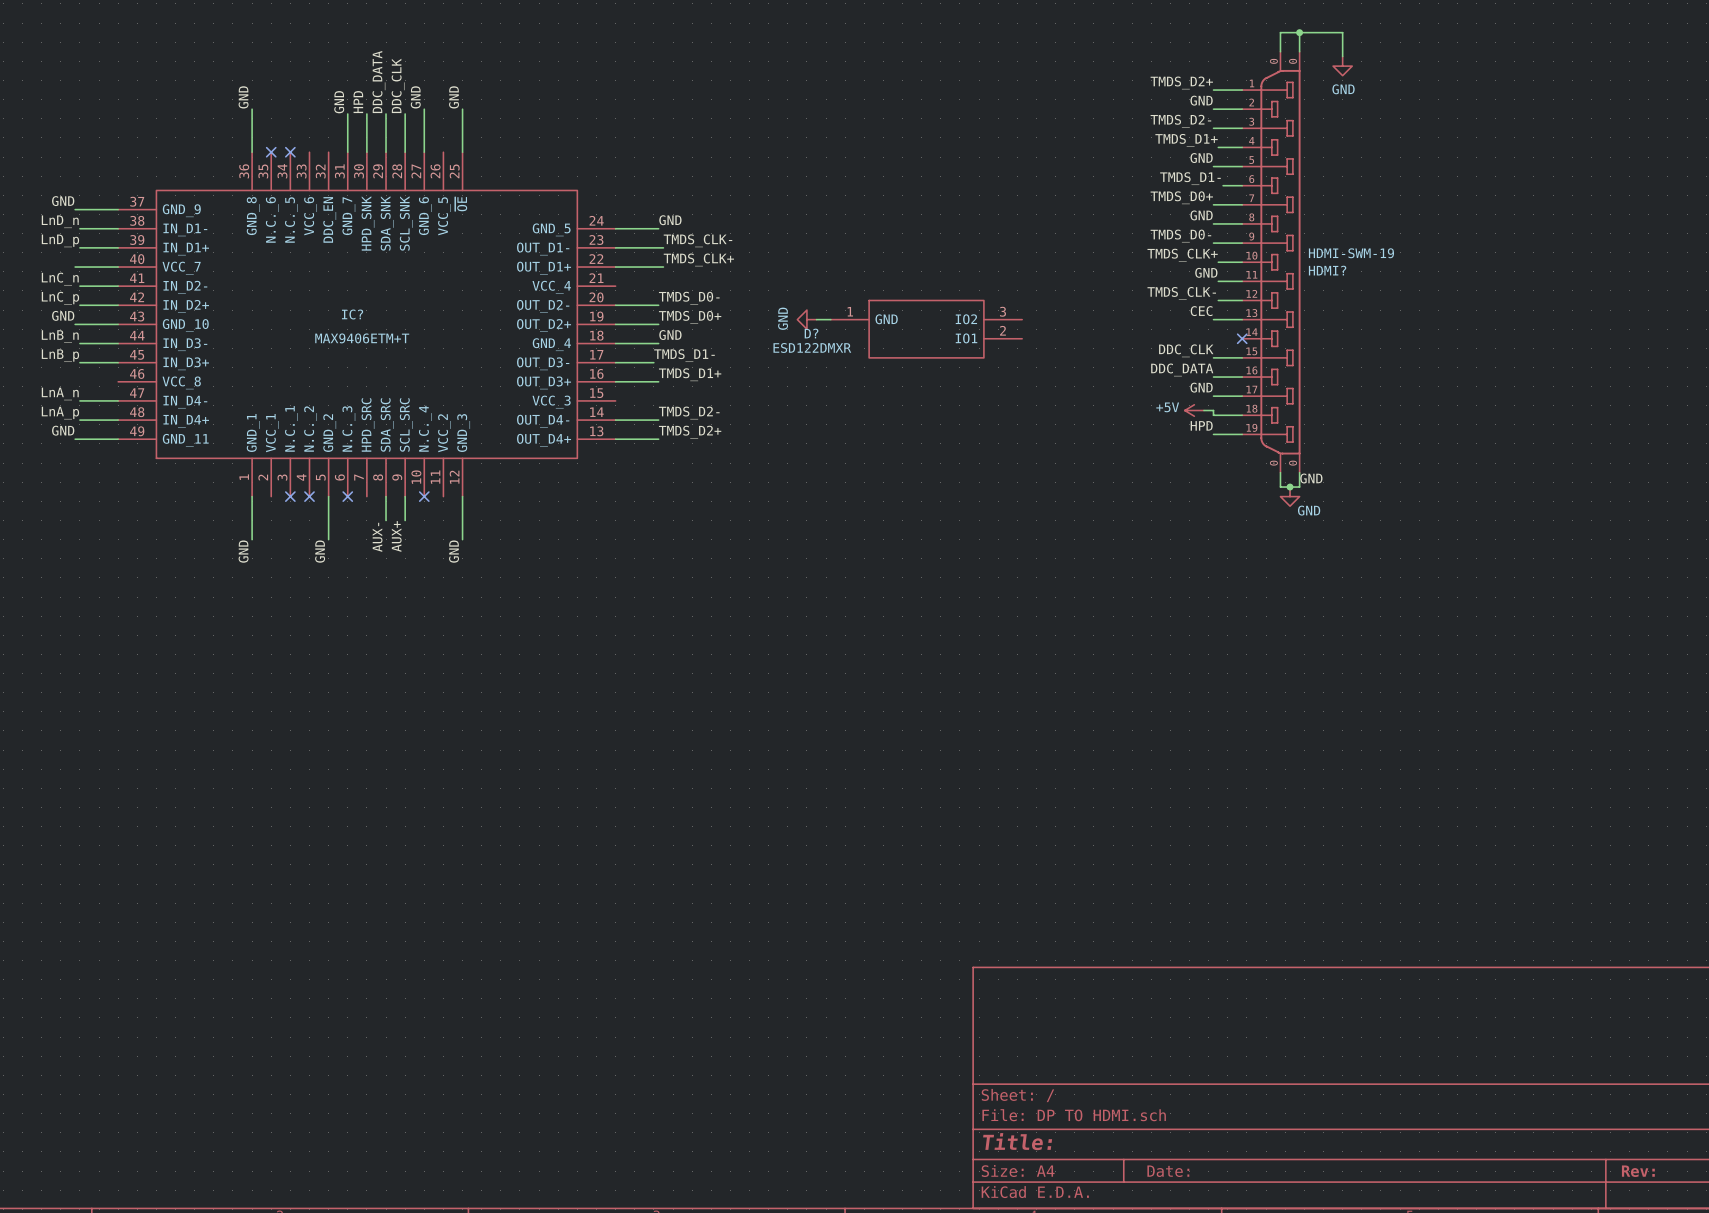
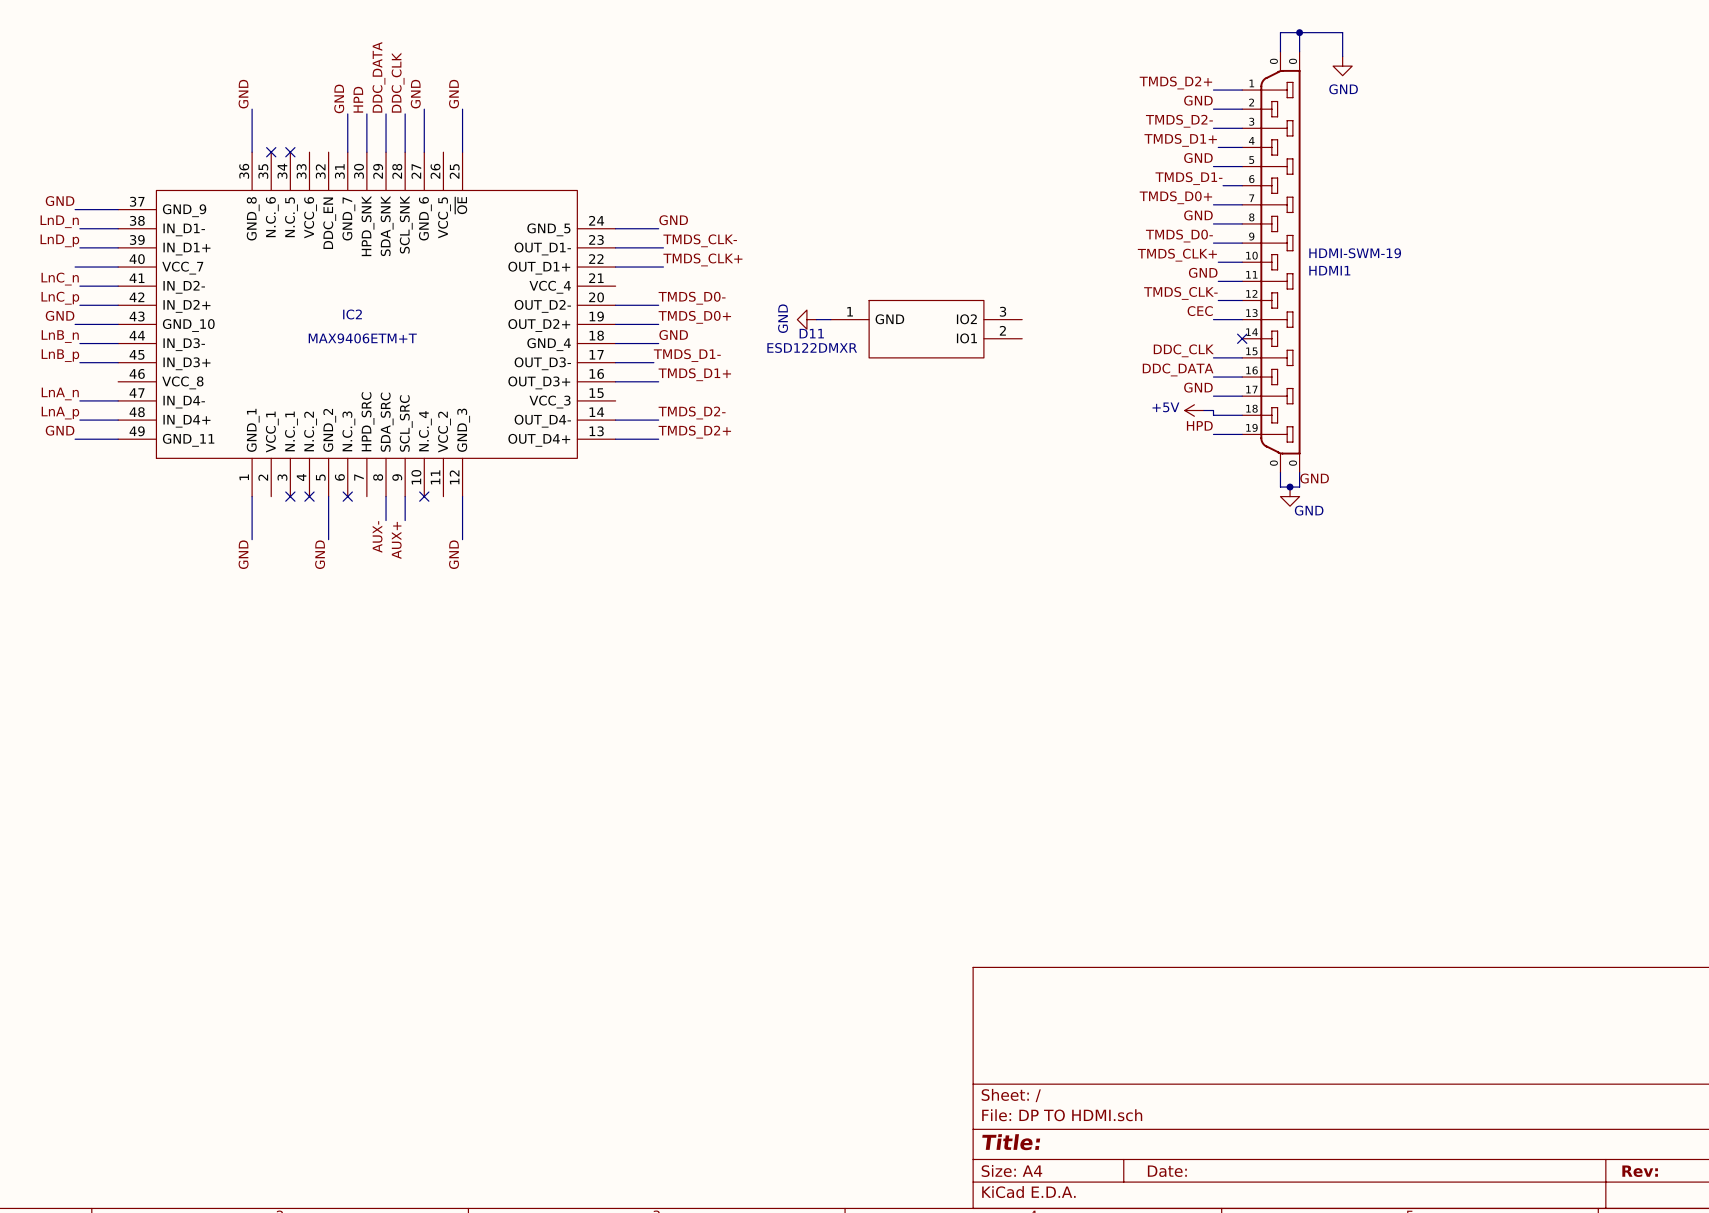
HDMI? name: HDMI? (1327, 270) -> HDMI1 (1329, 270)
IC? name: IC? (352, 314) -> IC2 (352, 314)
D? name: D? (811, 333) -> D11 (811, 333)

